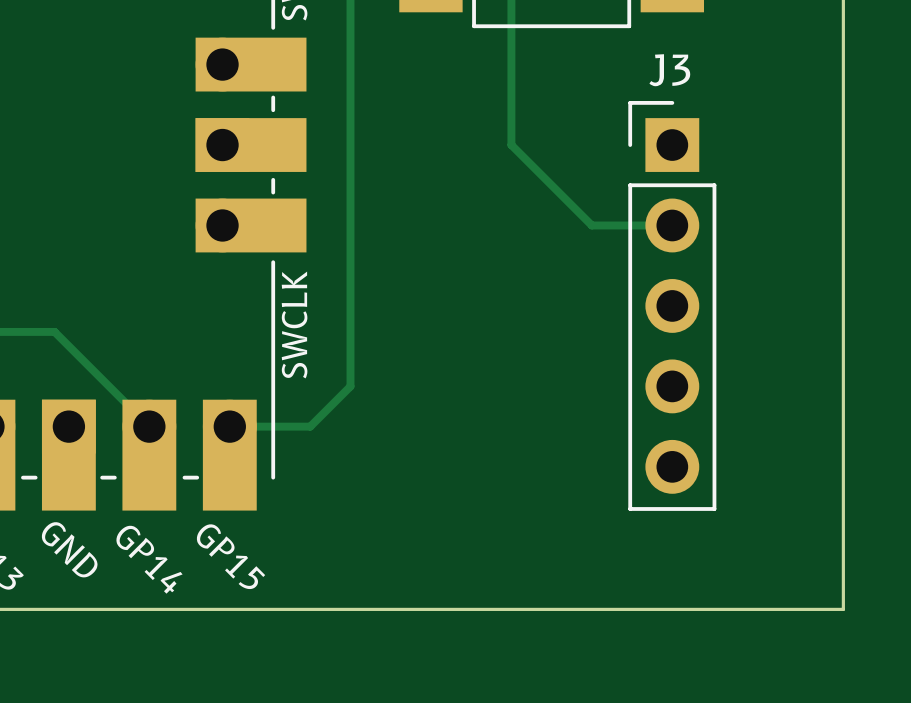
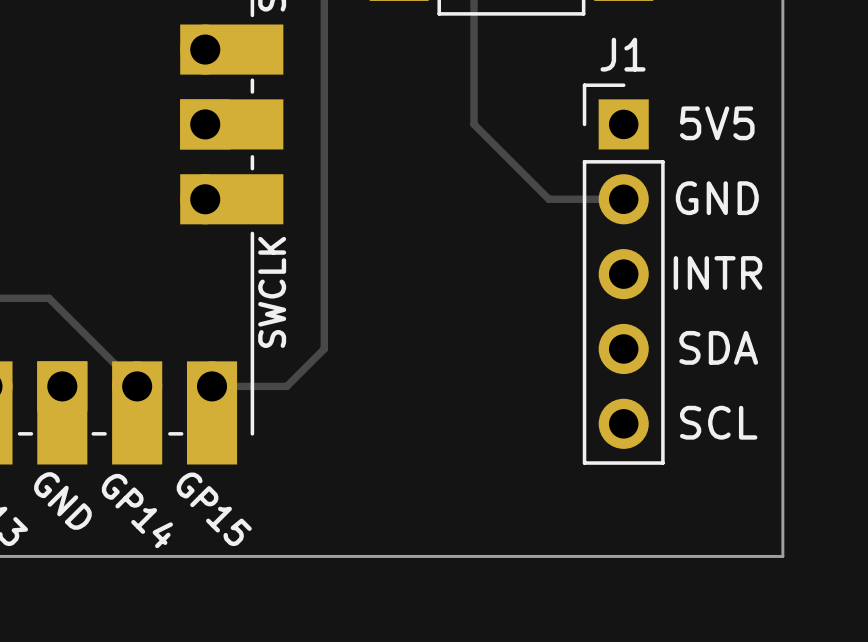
J3 name: J3 (669, 70) -> J1 (623, 54)
text: none -> 5V5 (717, 123)
text: none -> GND (717, 198)
text: none -> INTR (717, 273)
text: none -> SDA (718, 347)
text: none -> SCL (718, 422)

